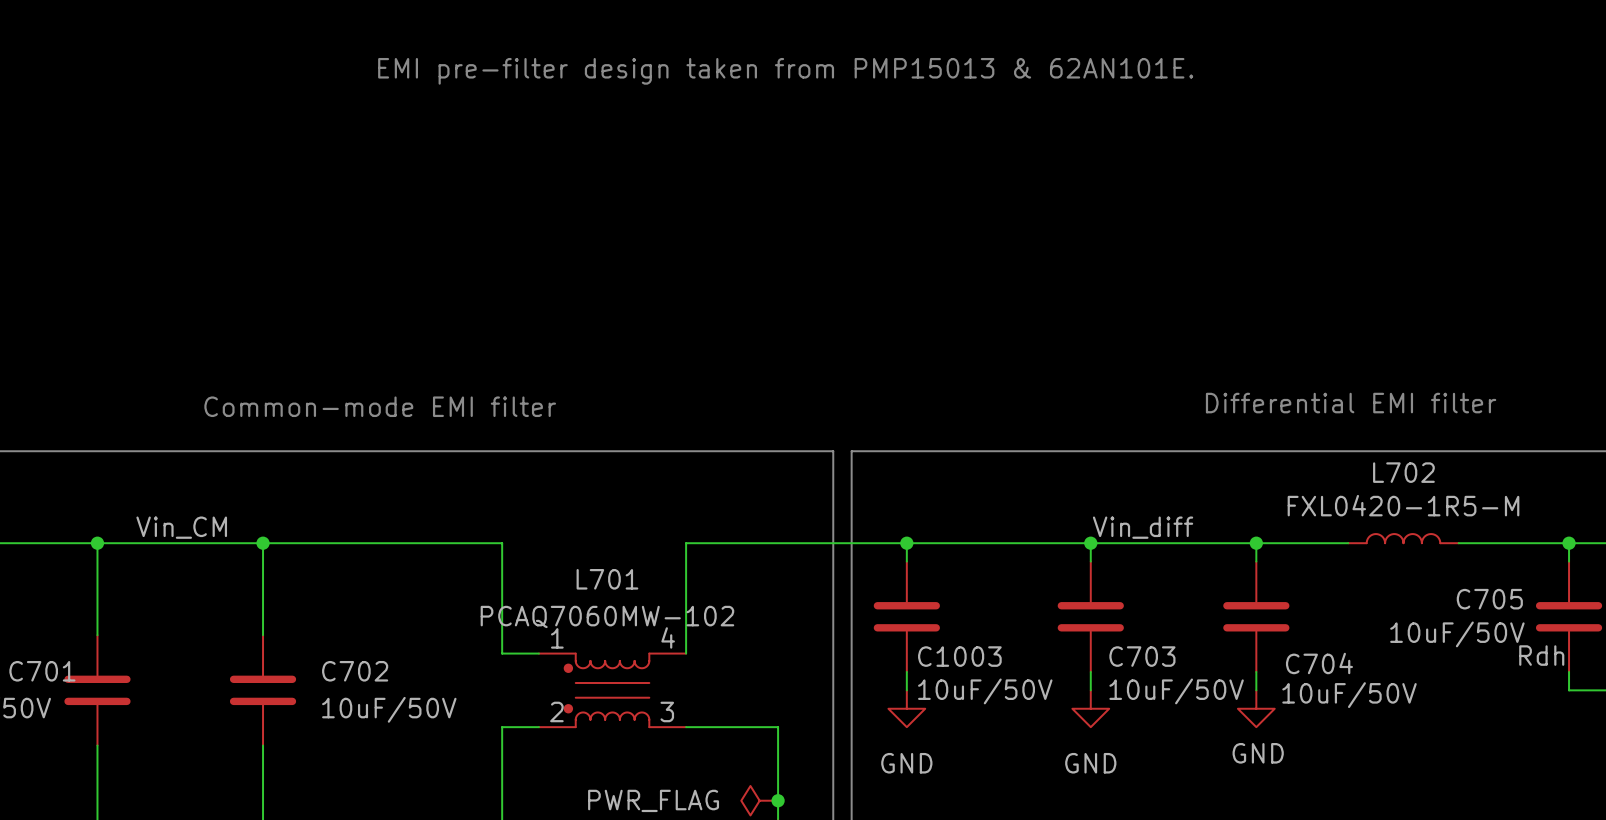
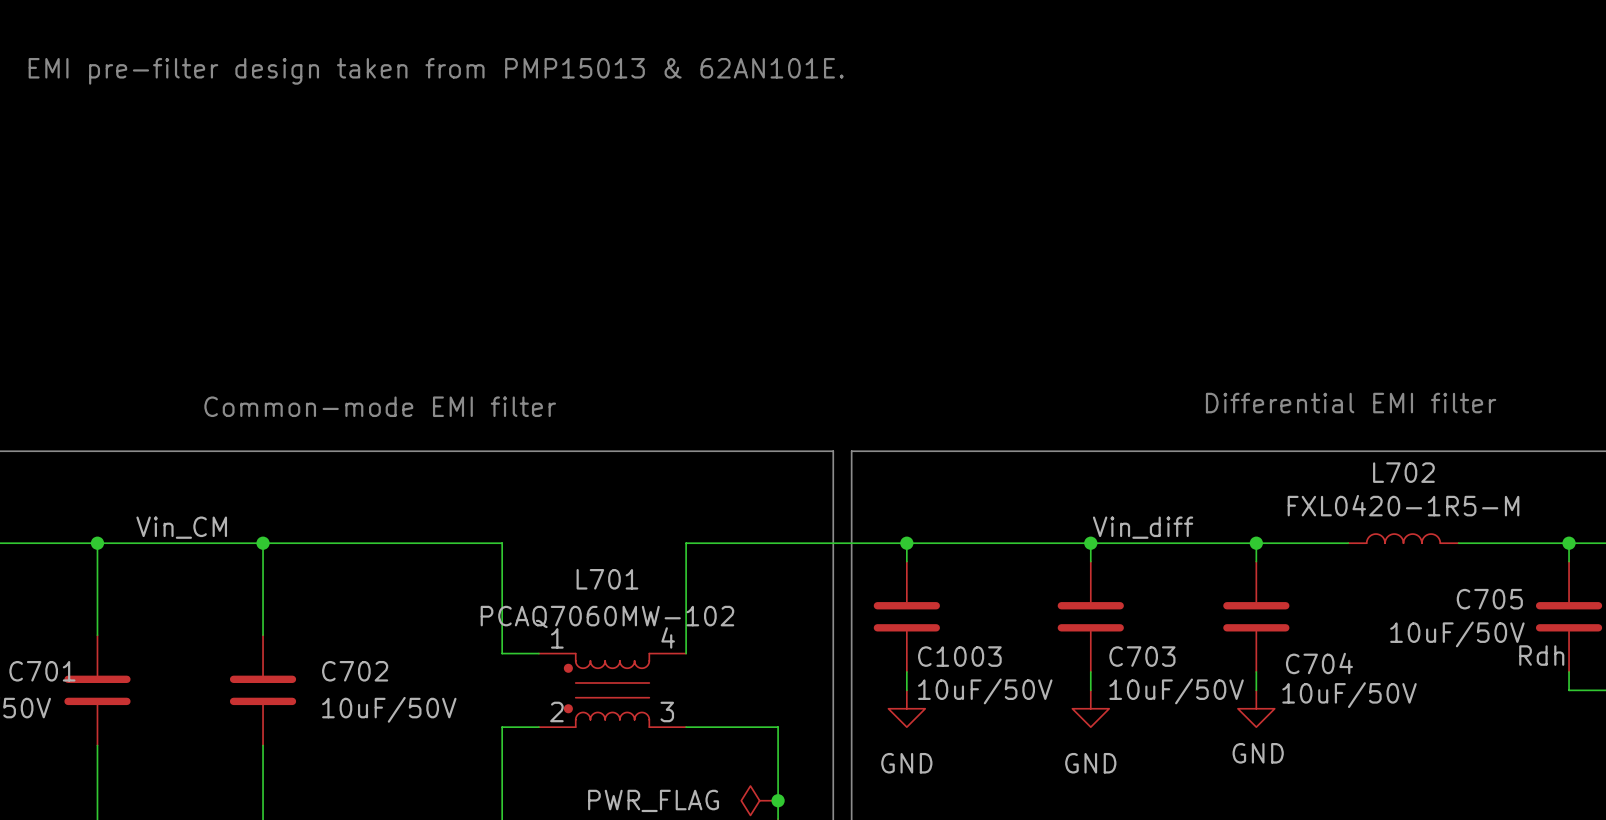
text position: EMI pre-filter design taken from PMP15013 & 62AN101E. (785, 71) -> EMI pre-filter design taken from PMP15013 & 62AN101E. (436, 71)

